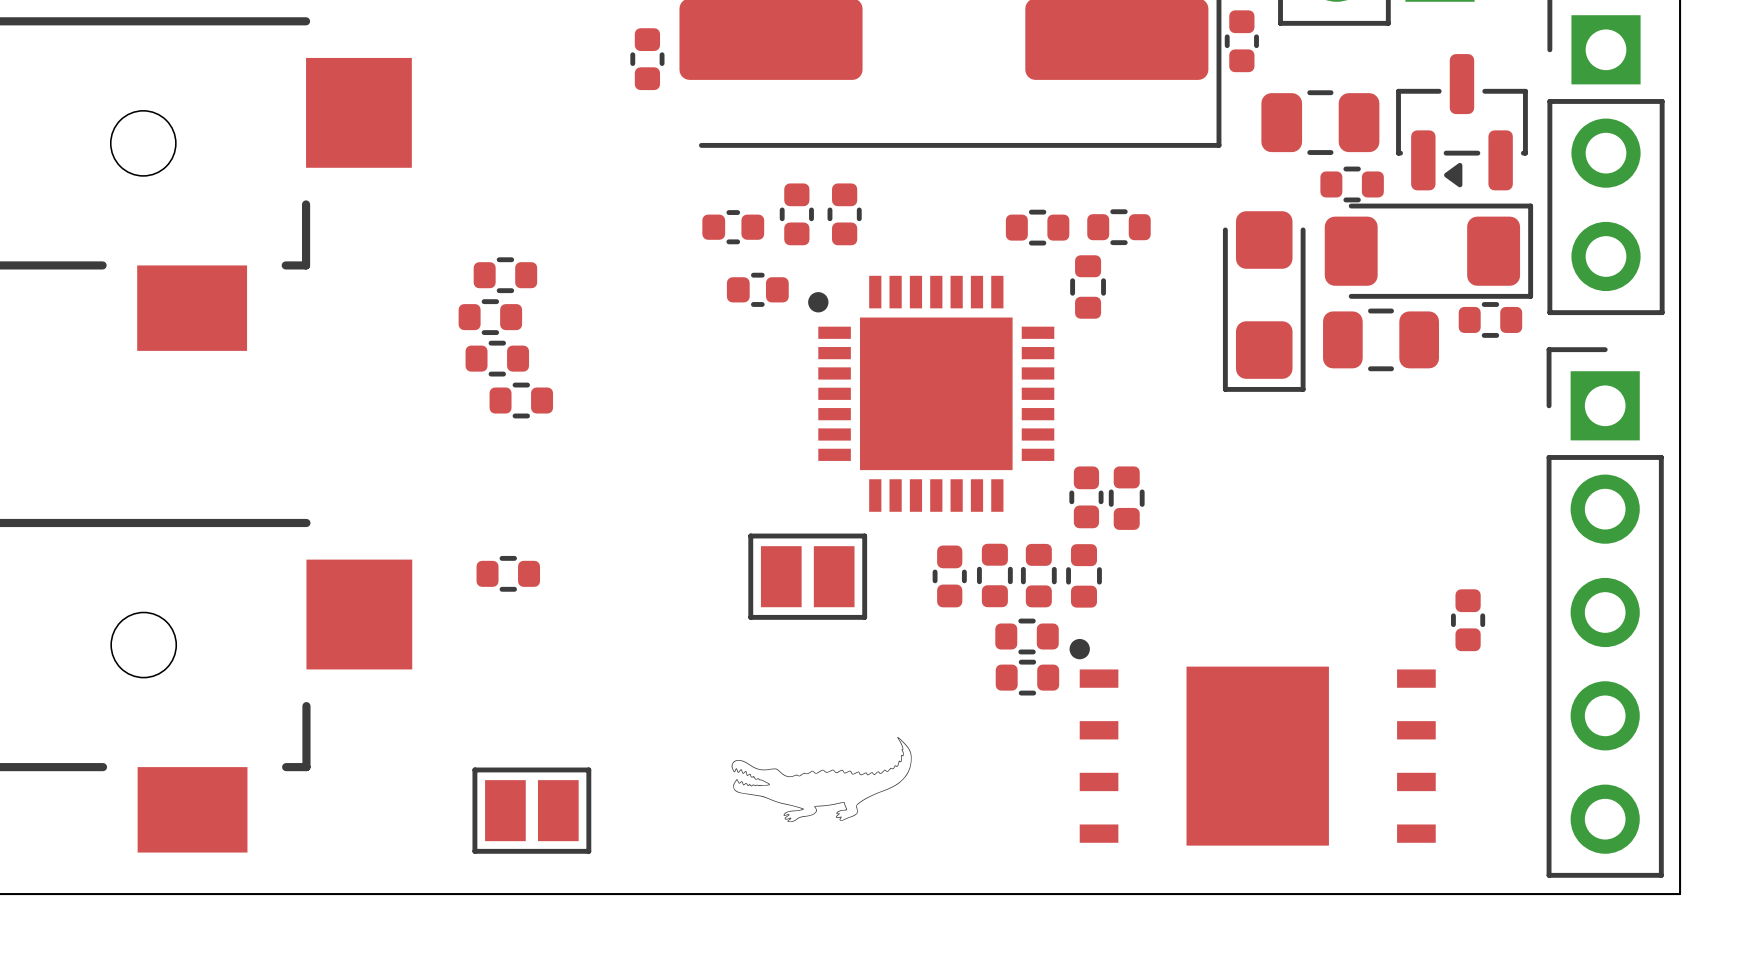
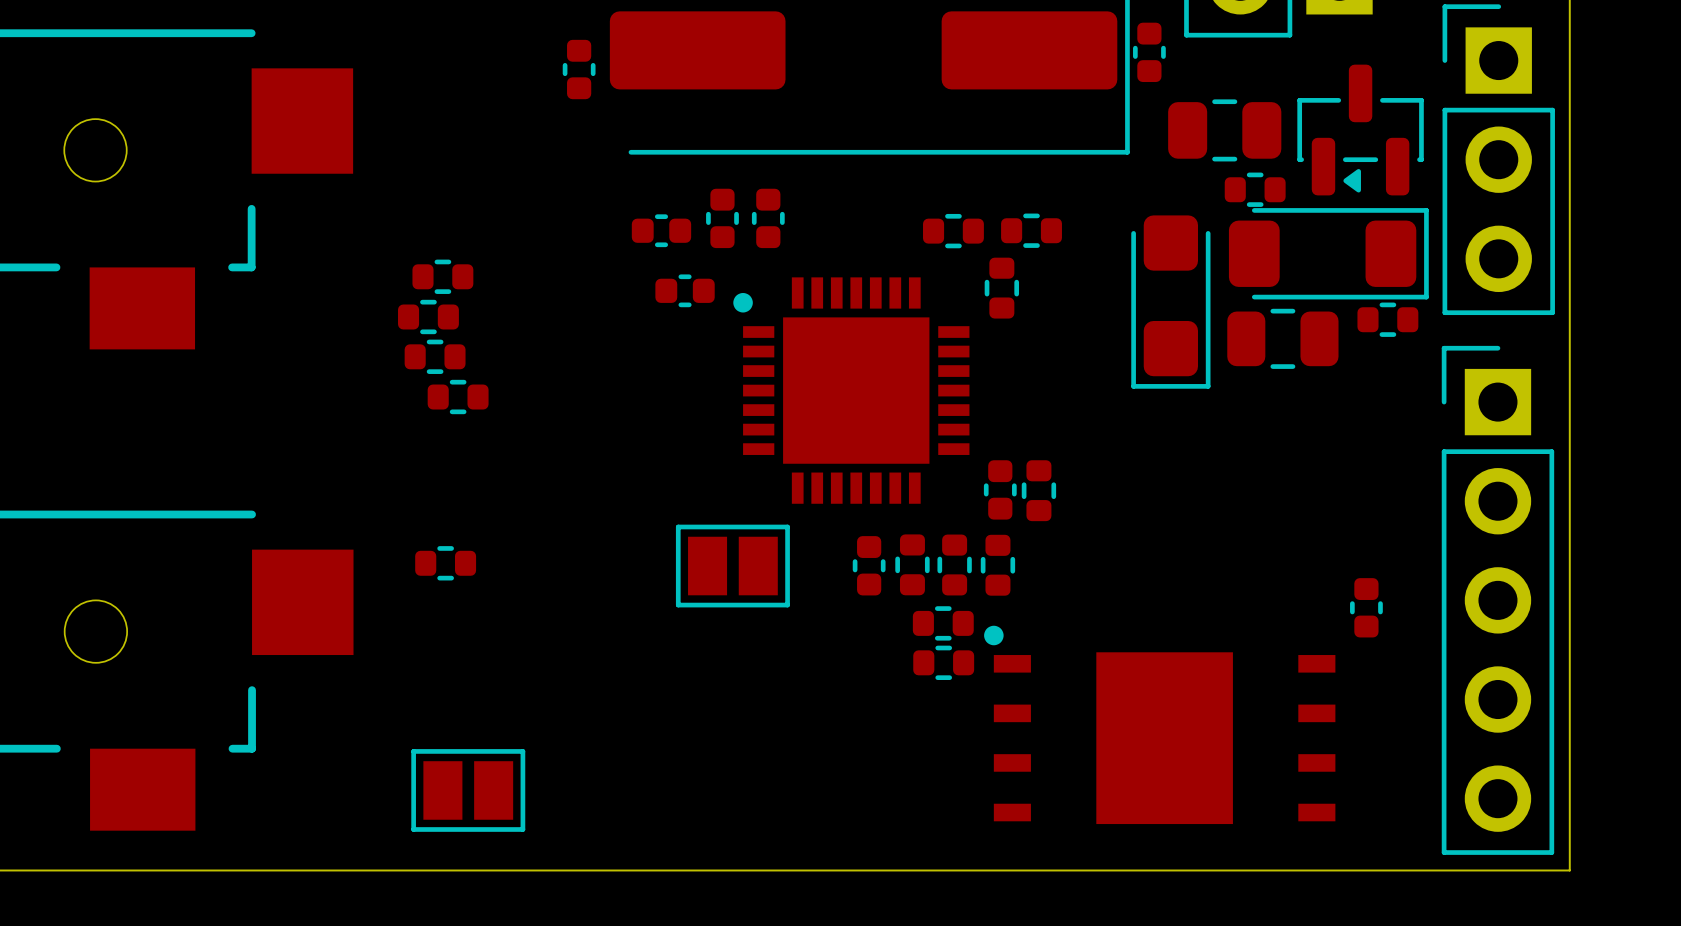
drawing: [731, 737, 912, 823] -> none

